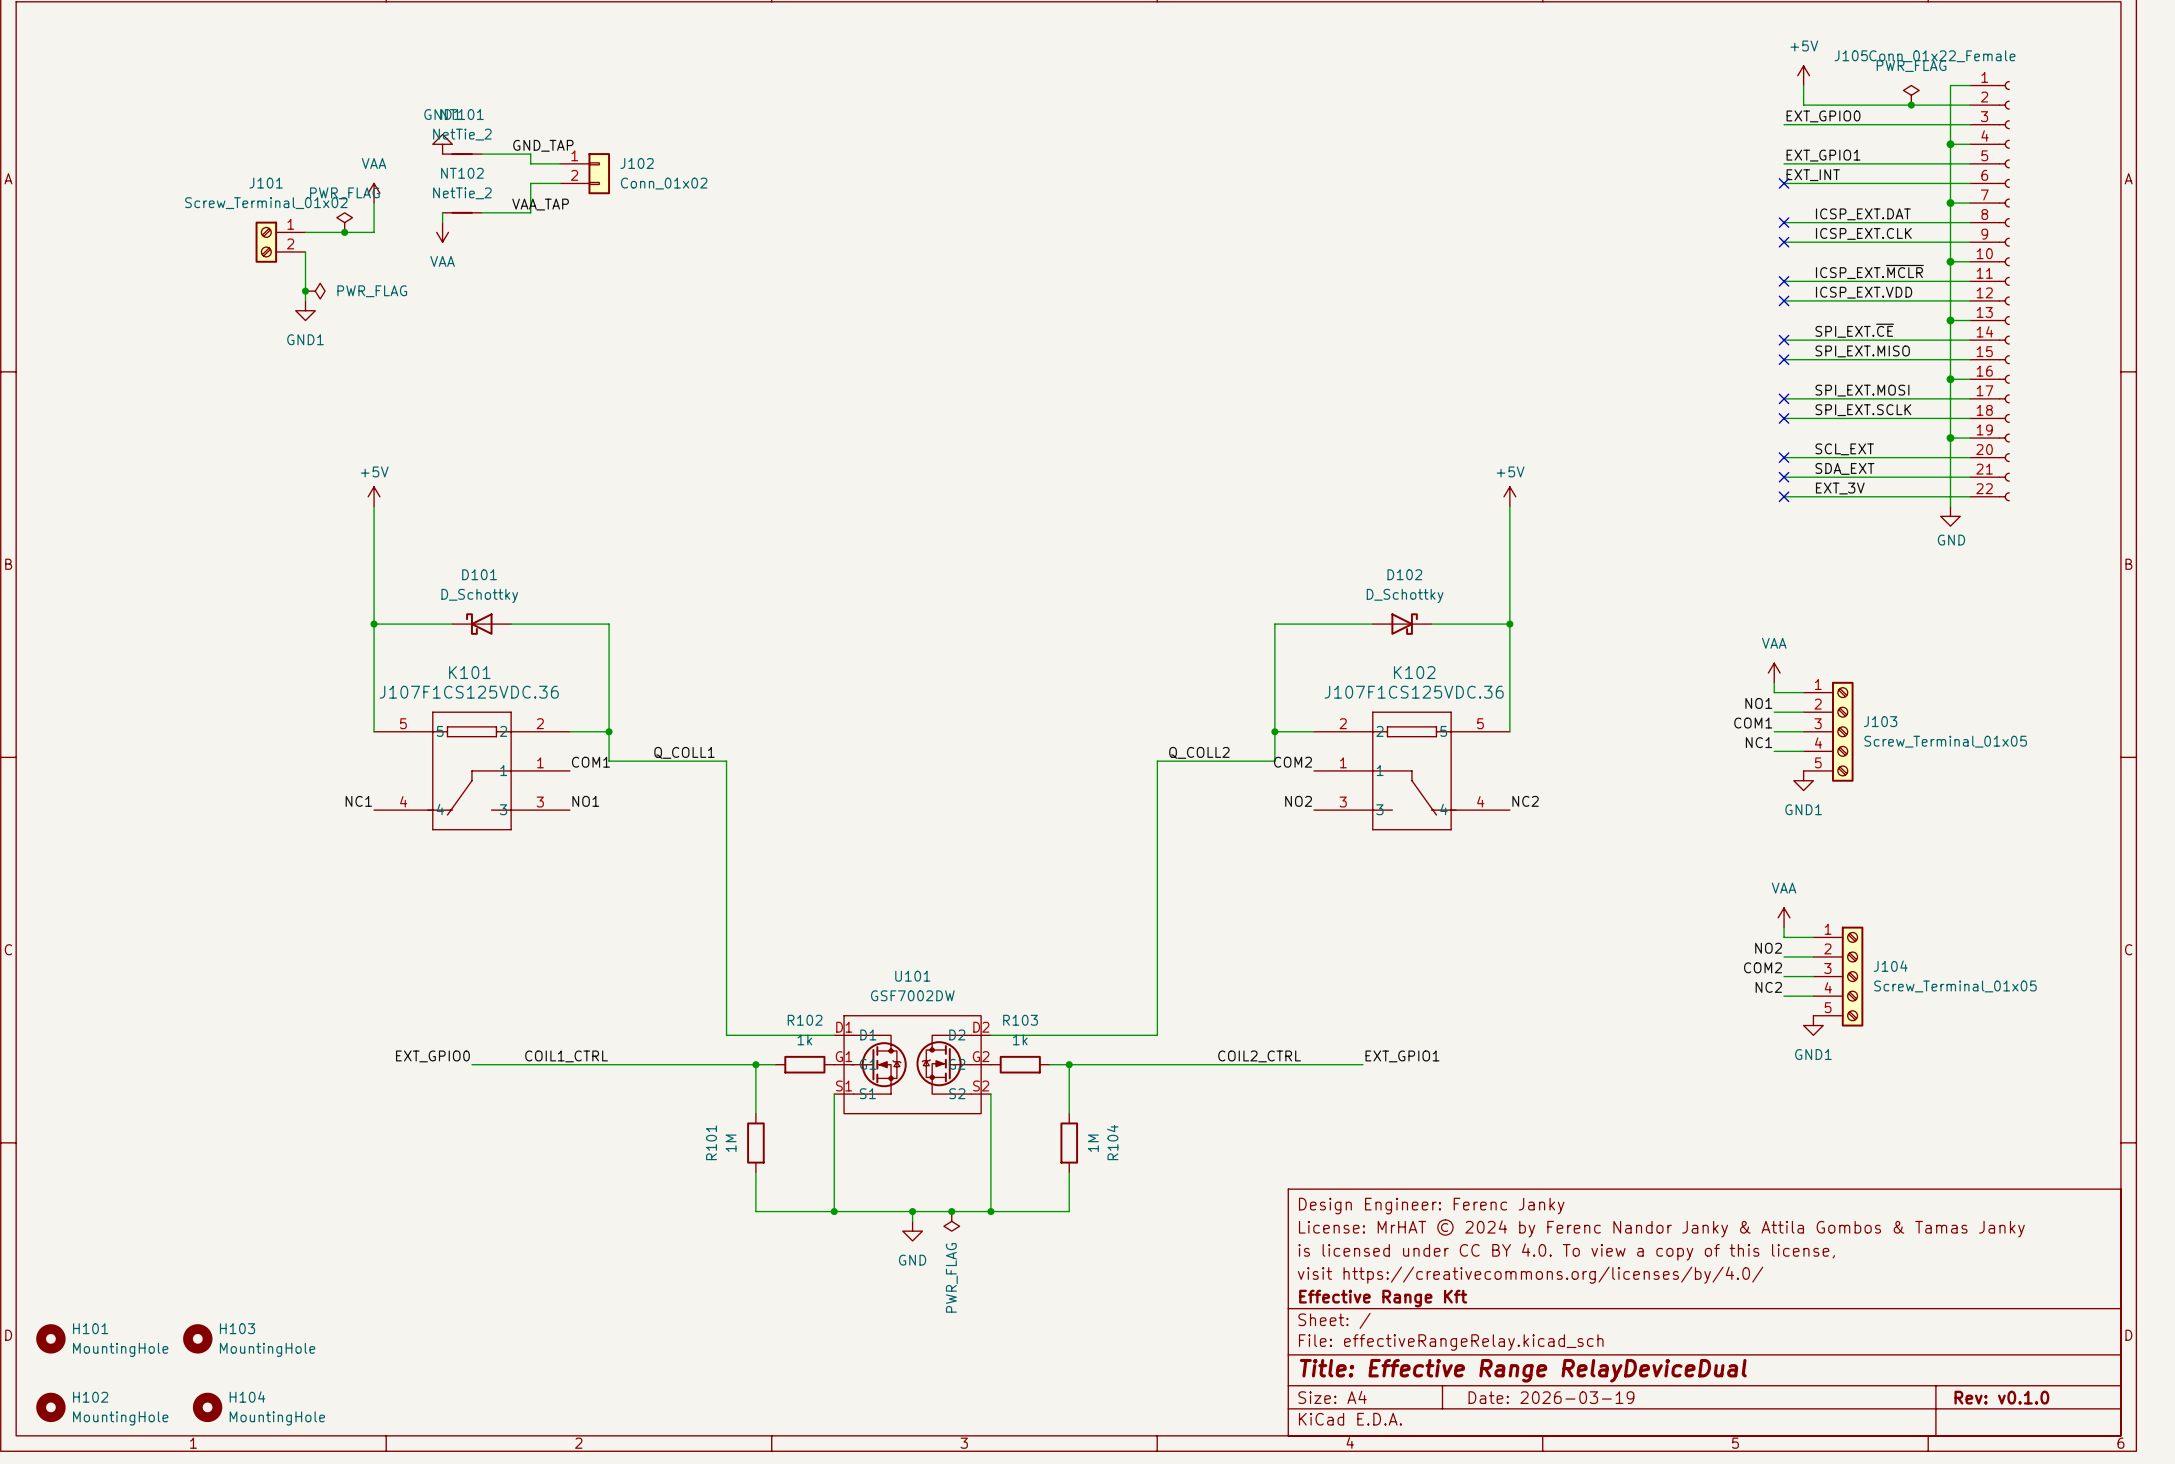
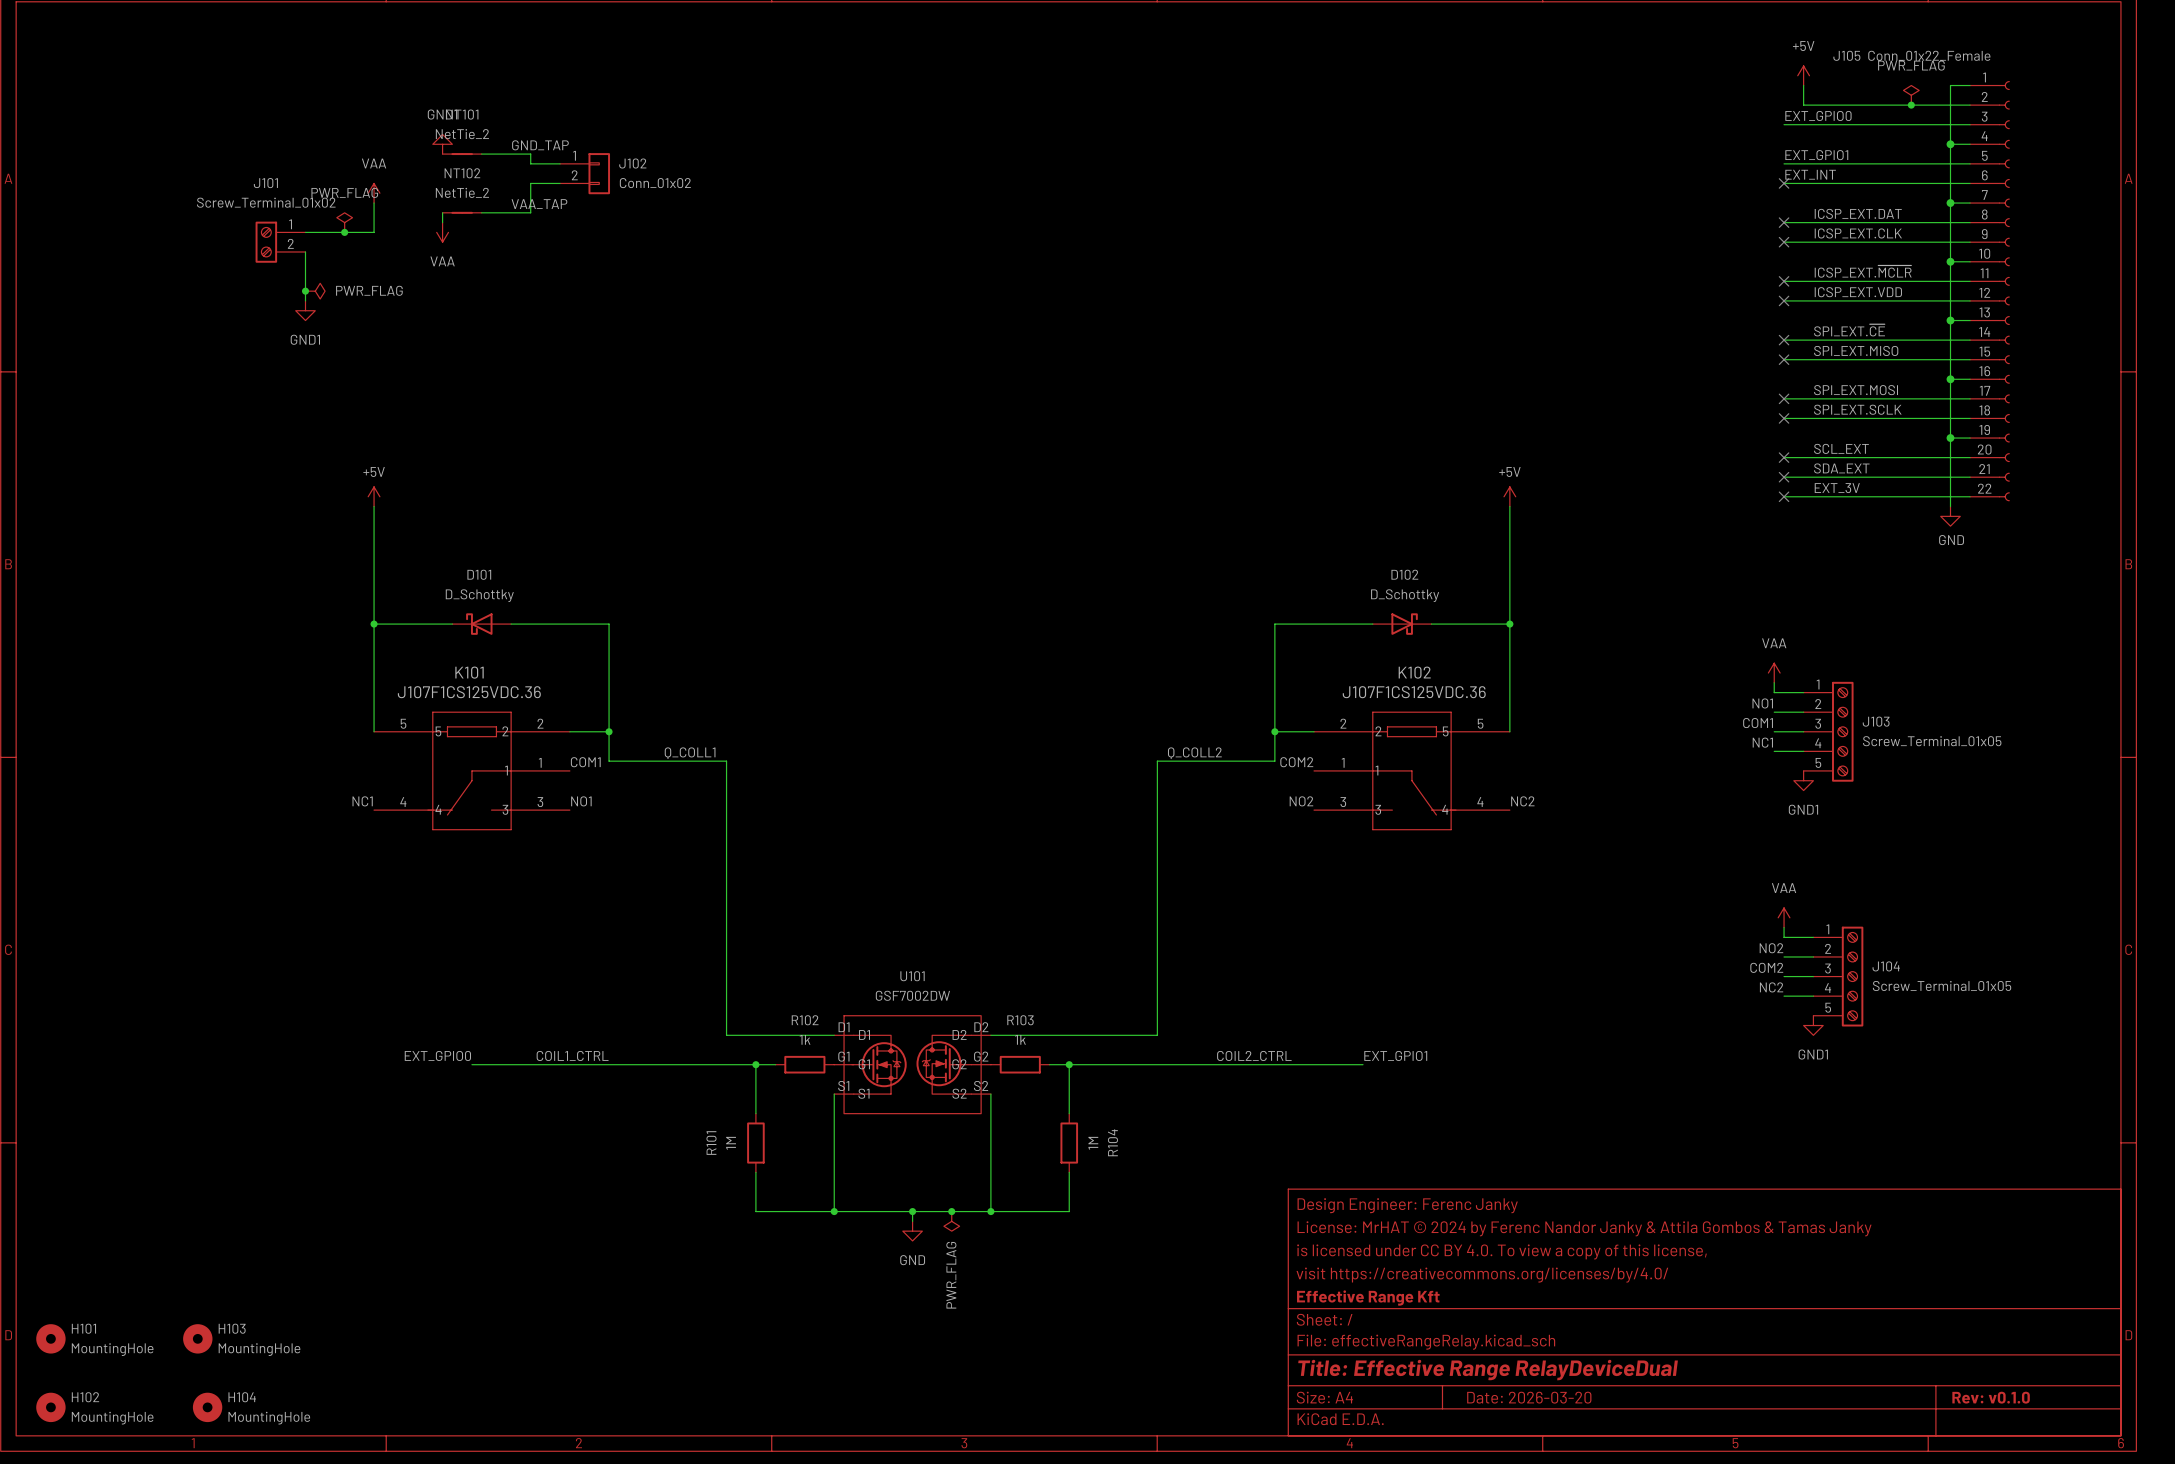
title block: Date: 2026-03-19 (1551, 1397) -> Date: 2026-03-20 (1529, 1397)

